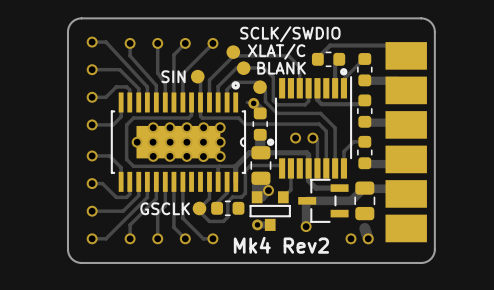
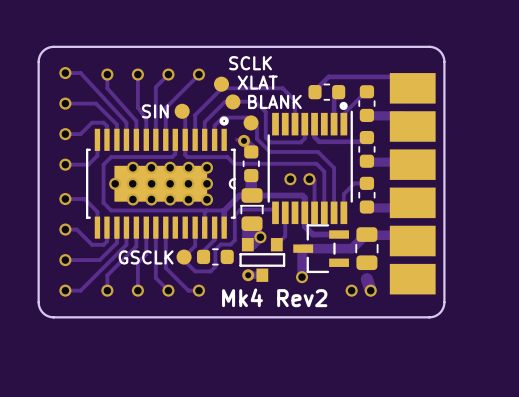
text: SCLK/SWDIO (290, 34) -> SCLK (250, 63)
text: XLAT/C (276, 51) -> XLAT (257, 82)
drawing: [266, 138, 275, 146] -> none
part footprint: [250, 146, 272, 185] -> [240, 188, 264, 231]

